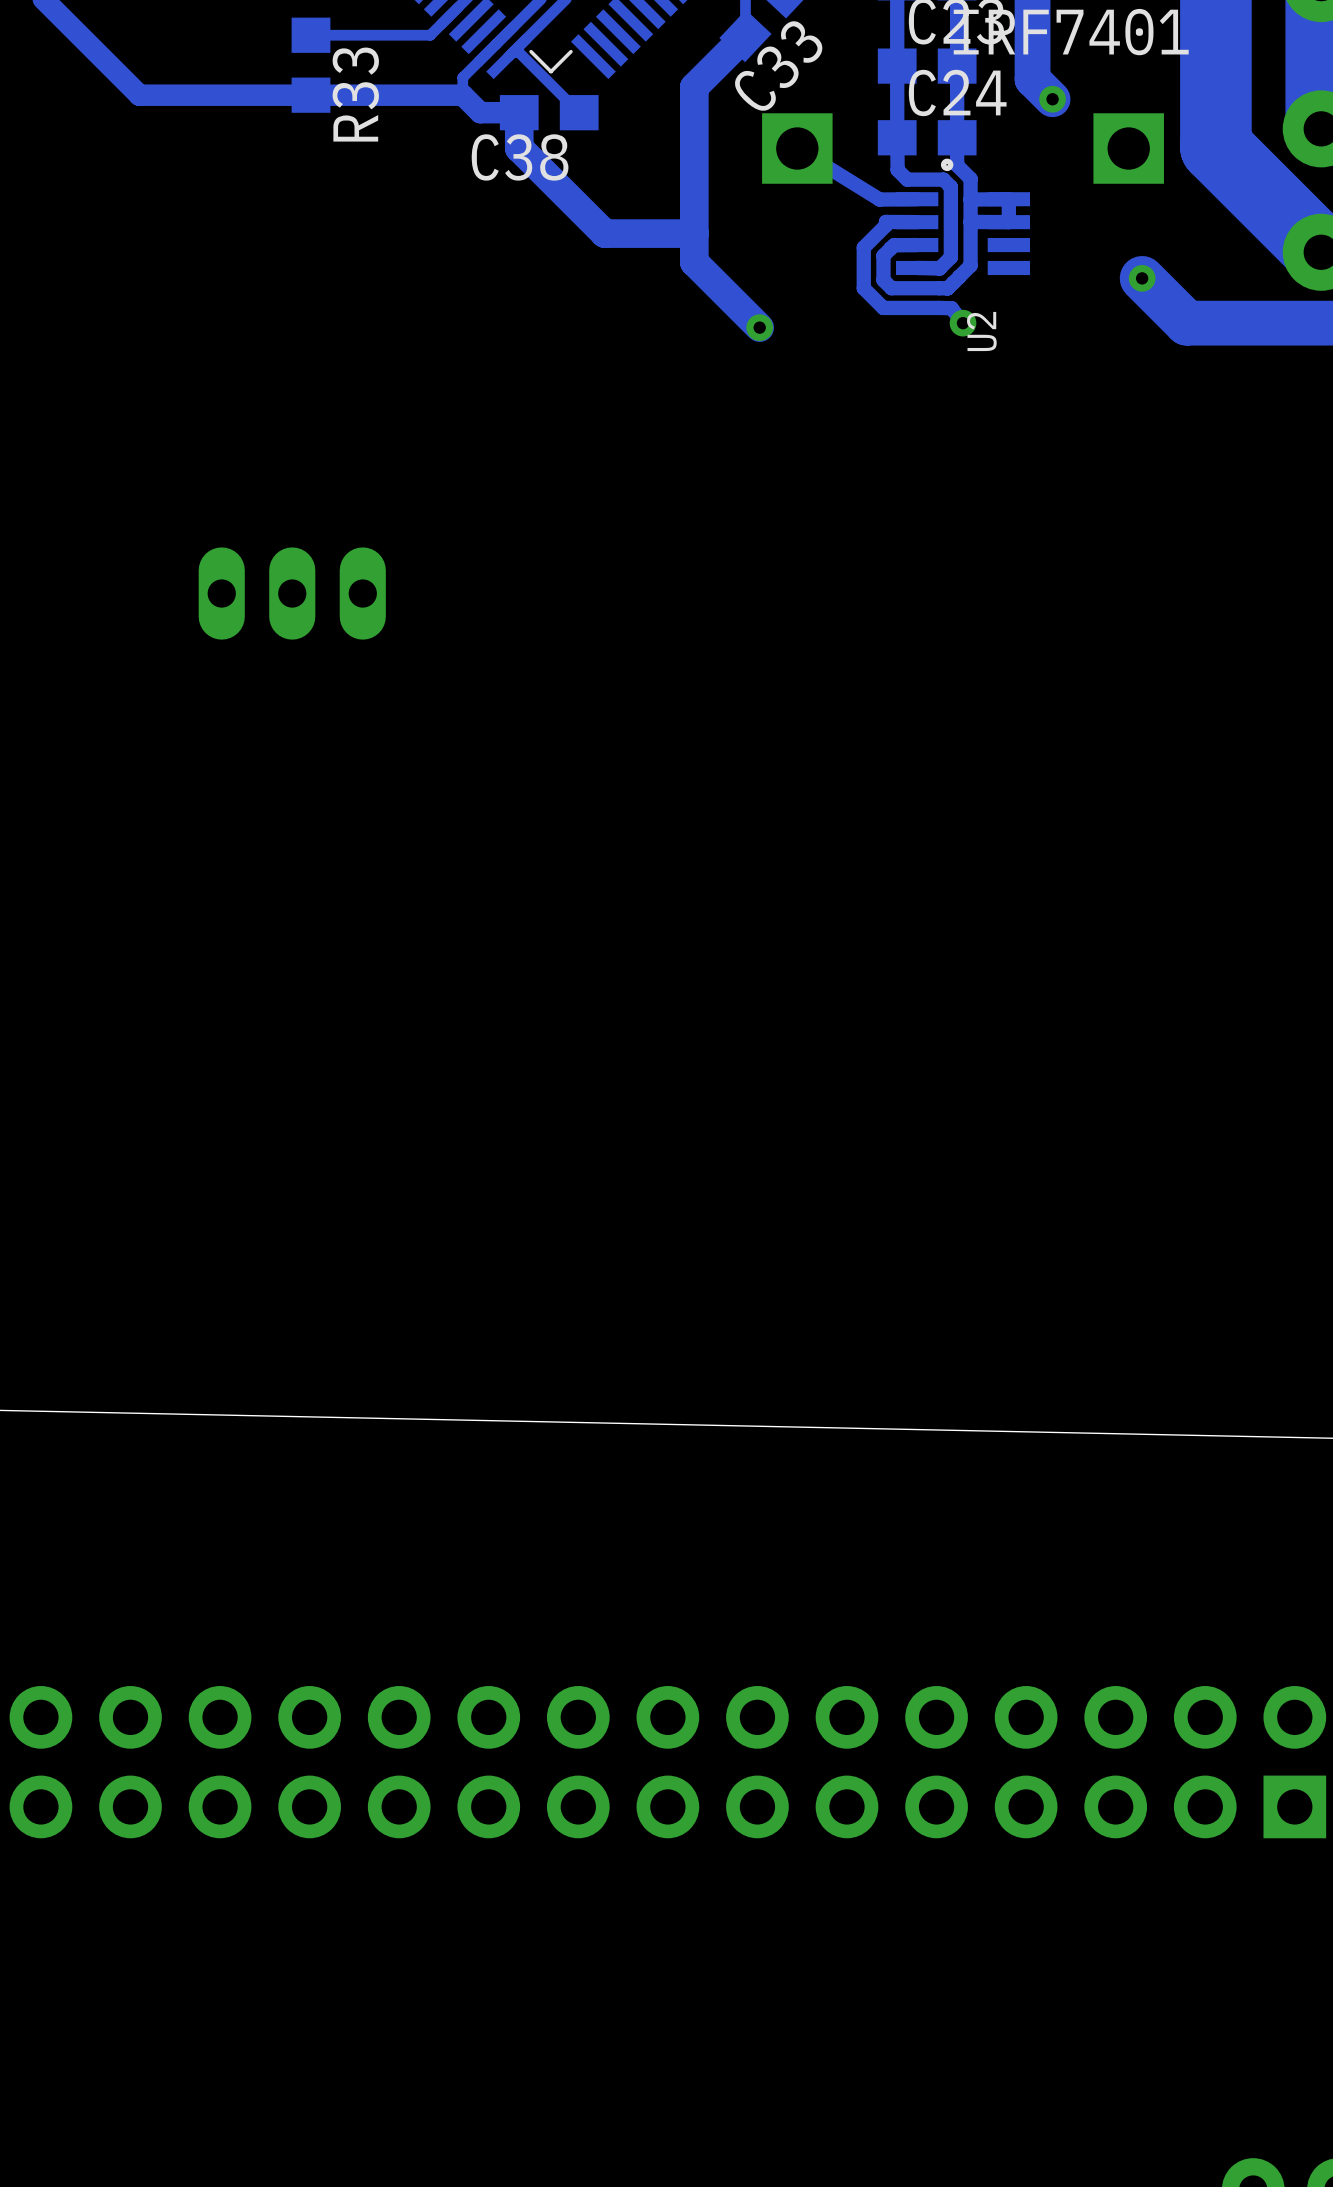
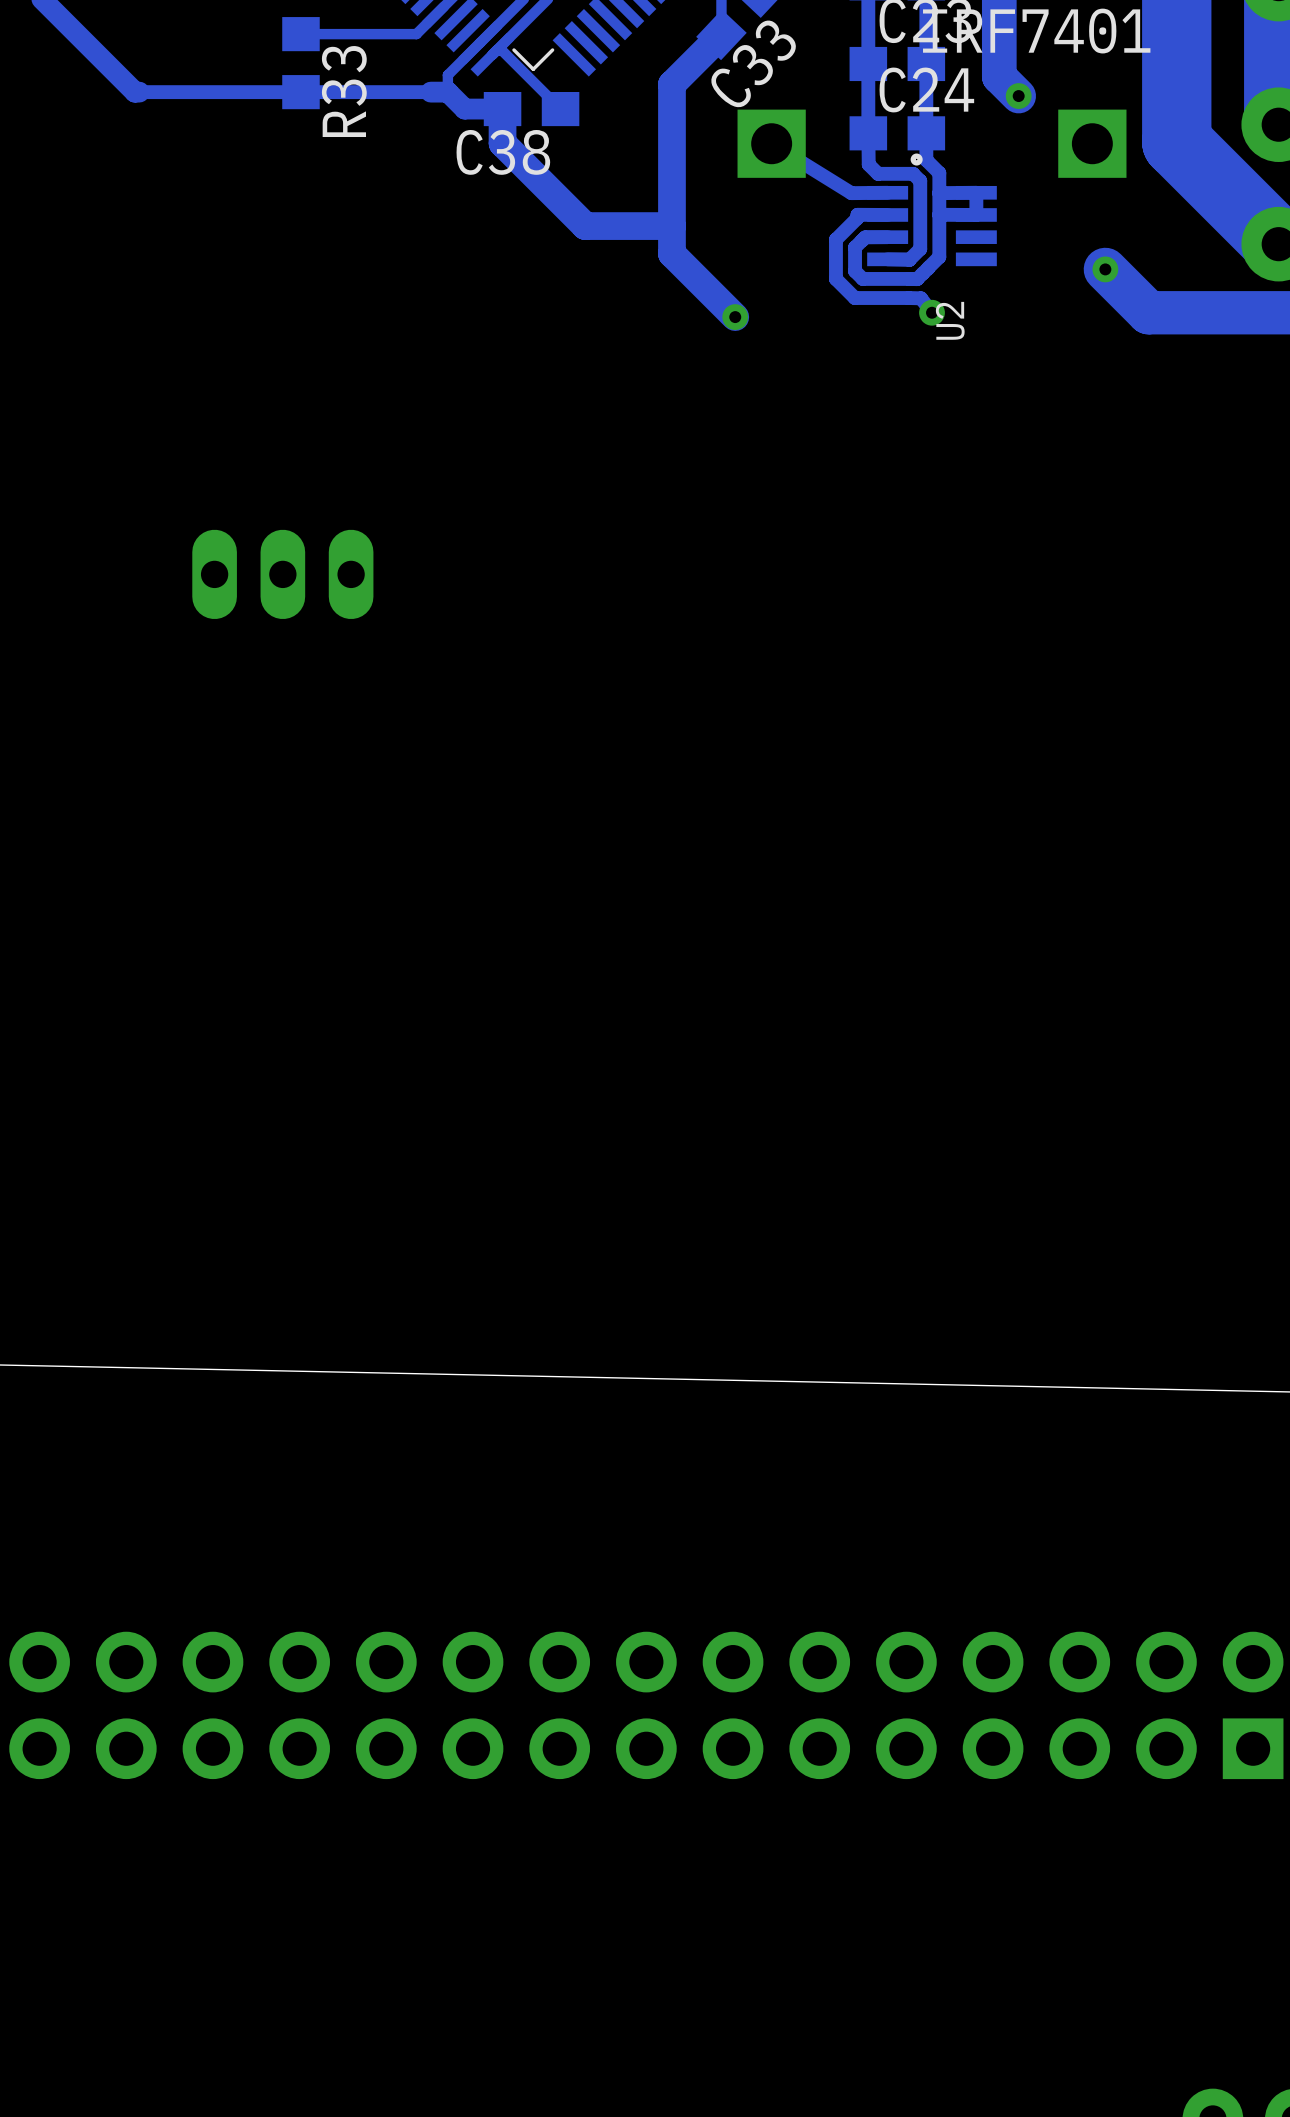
track width: thick (445, 95) (143, 95) -> thin (430, 92) (139, 92)

